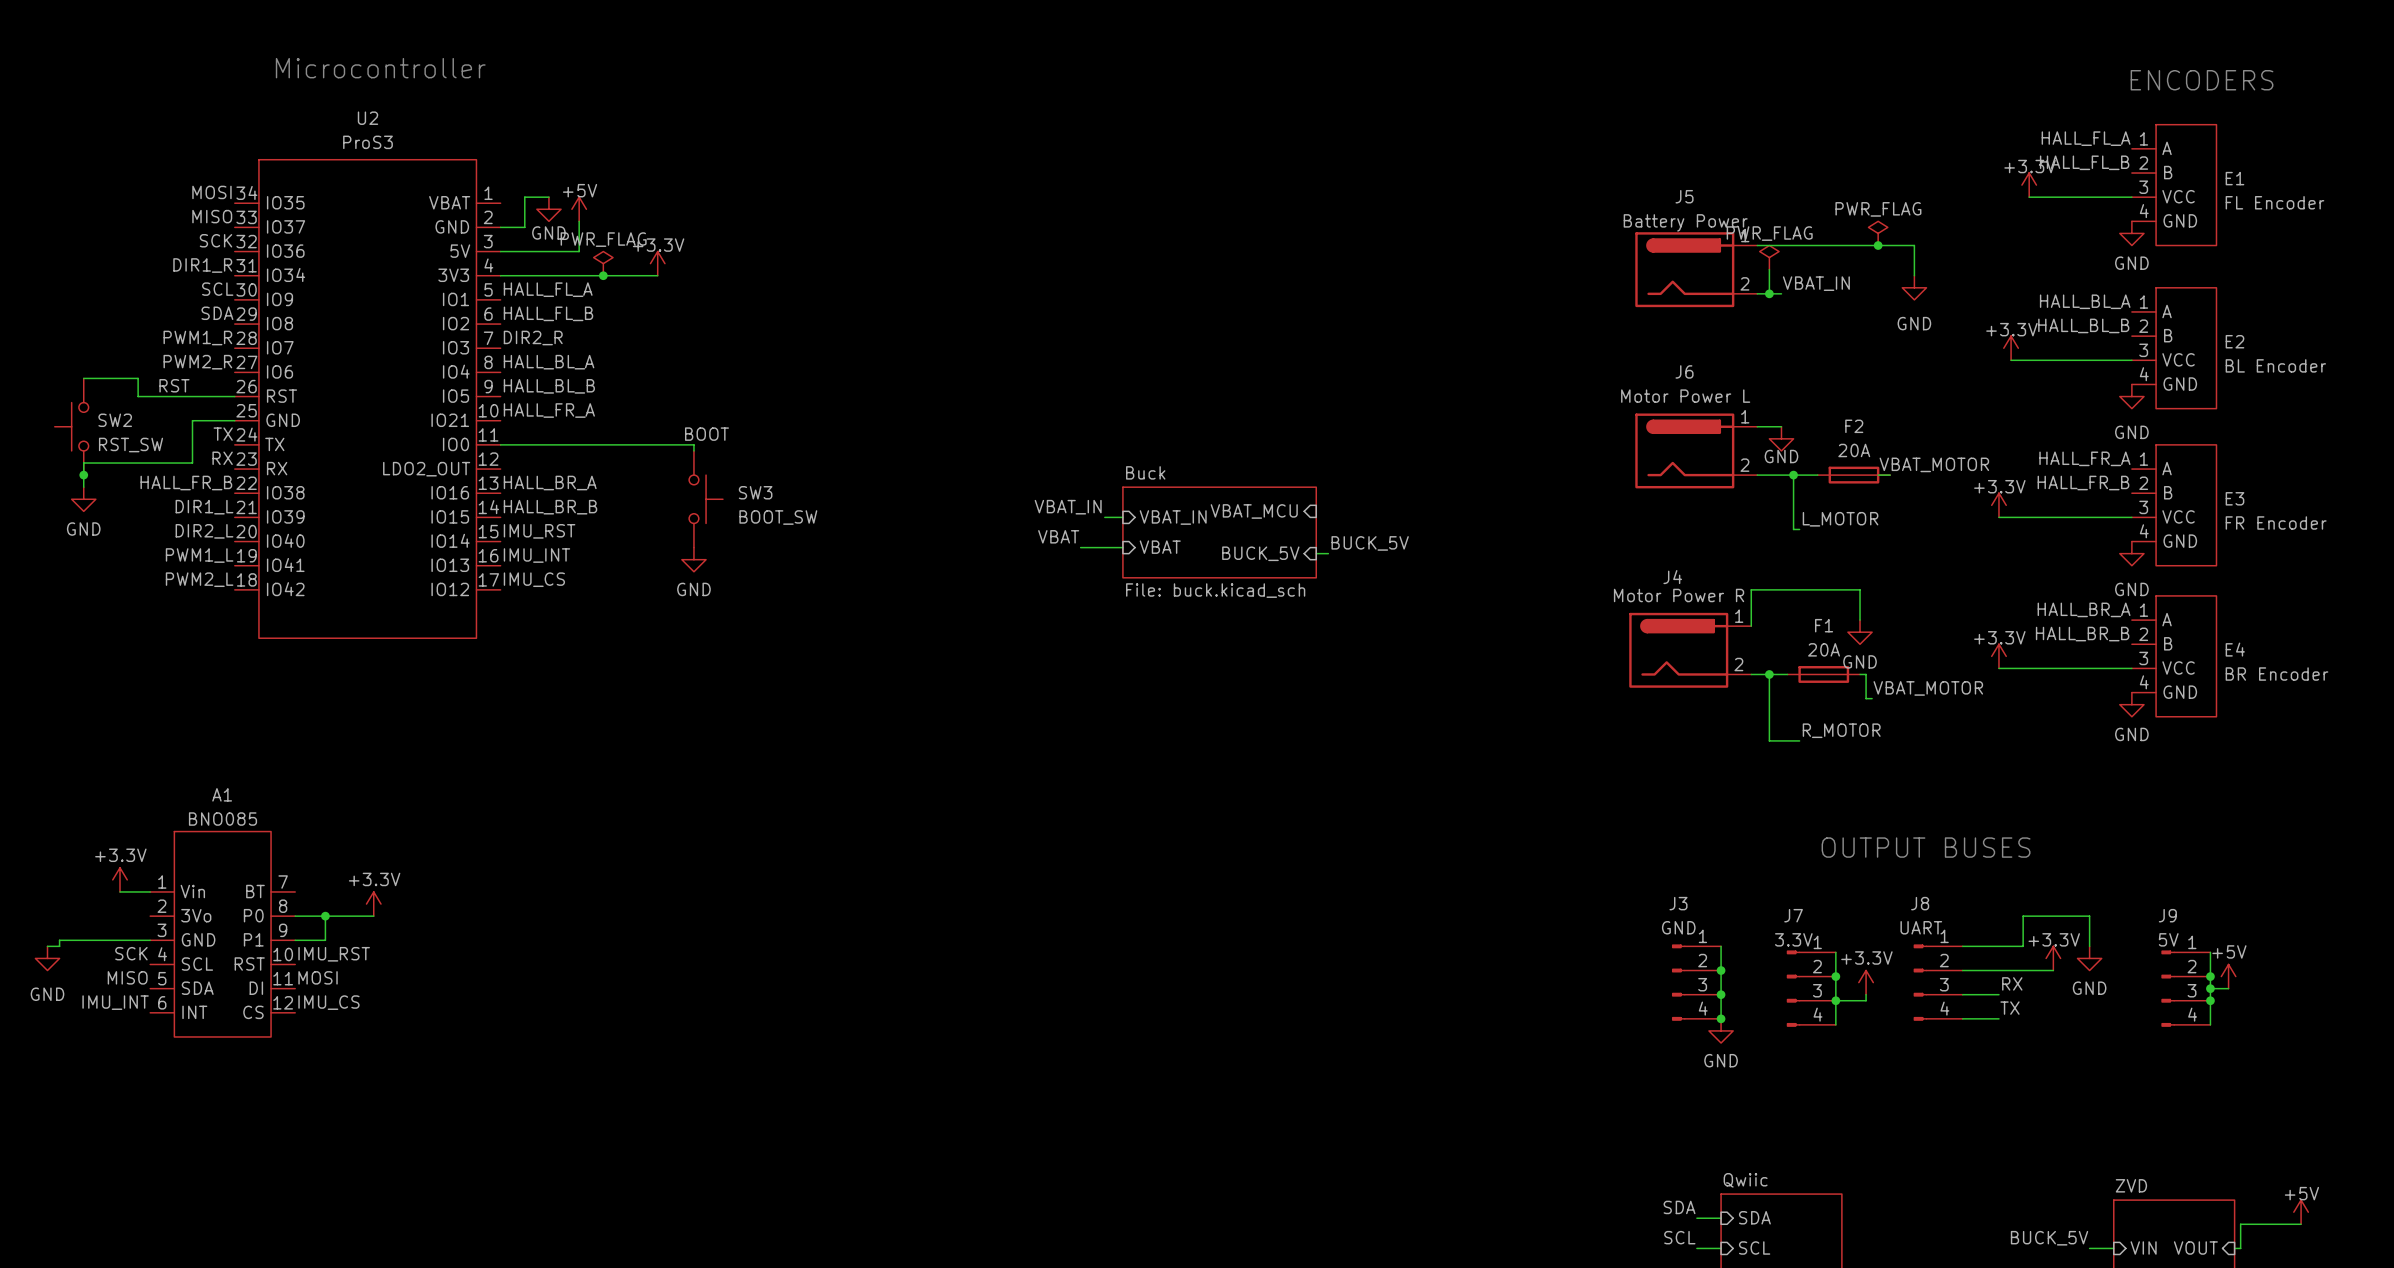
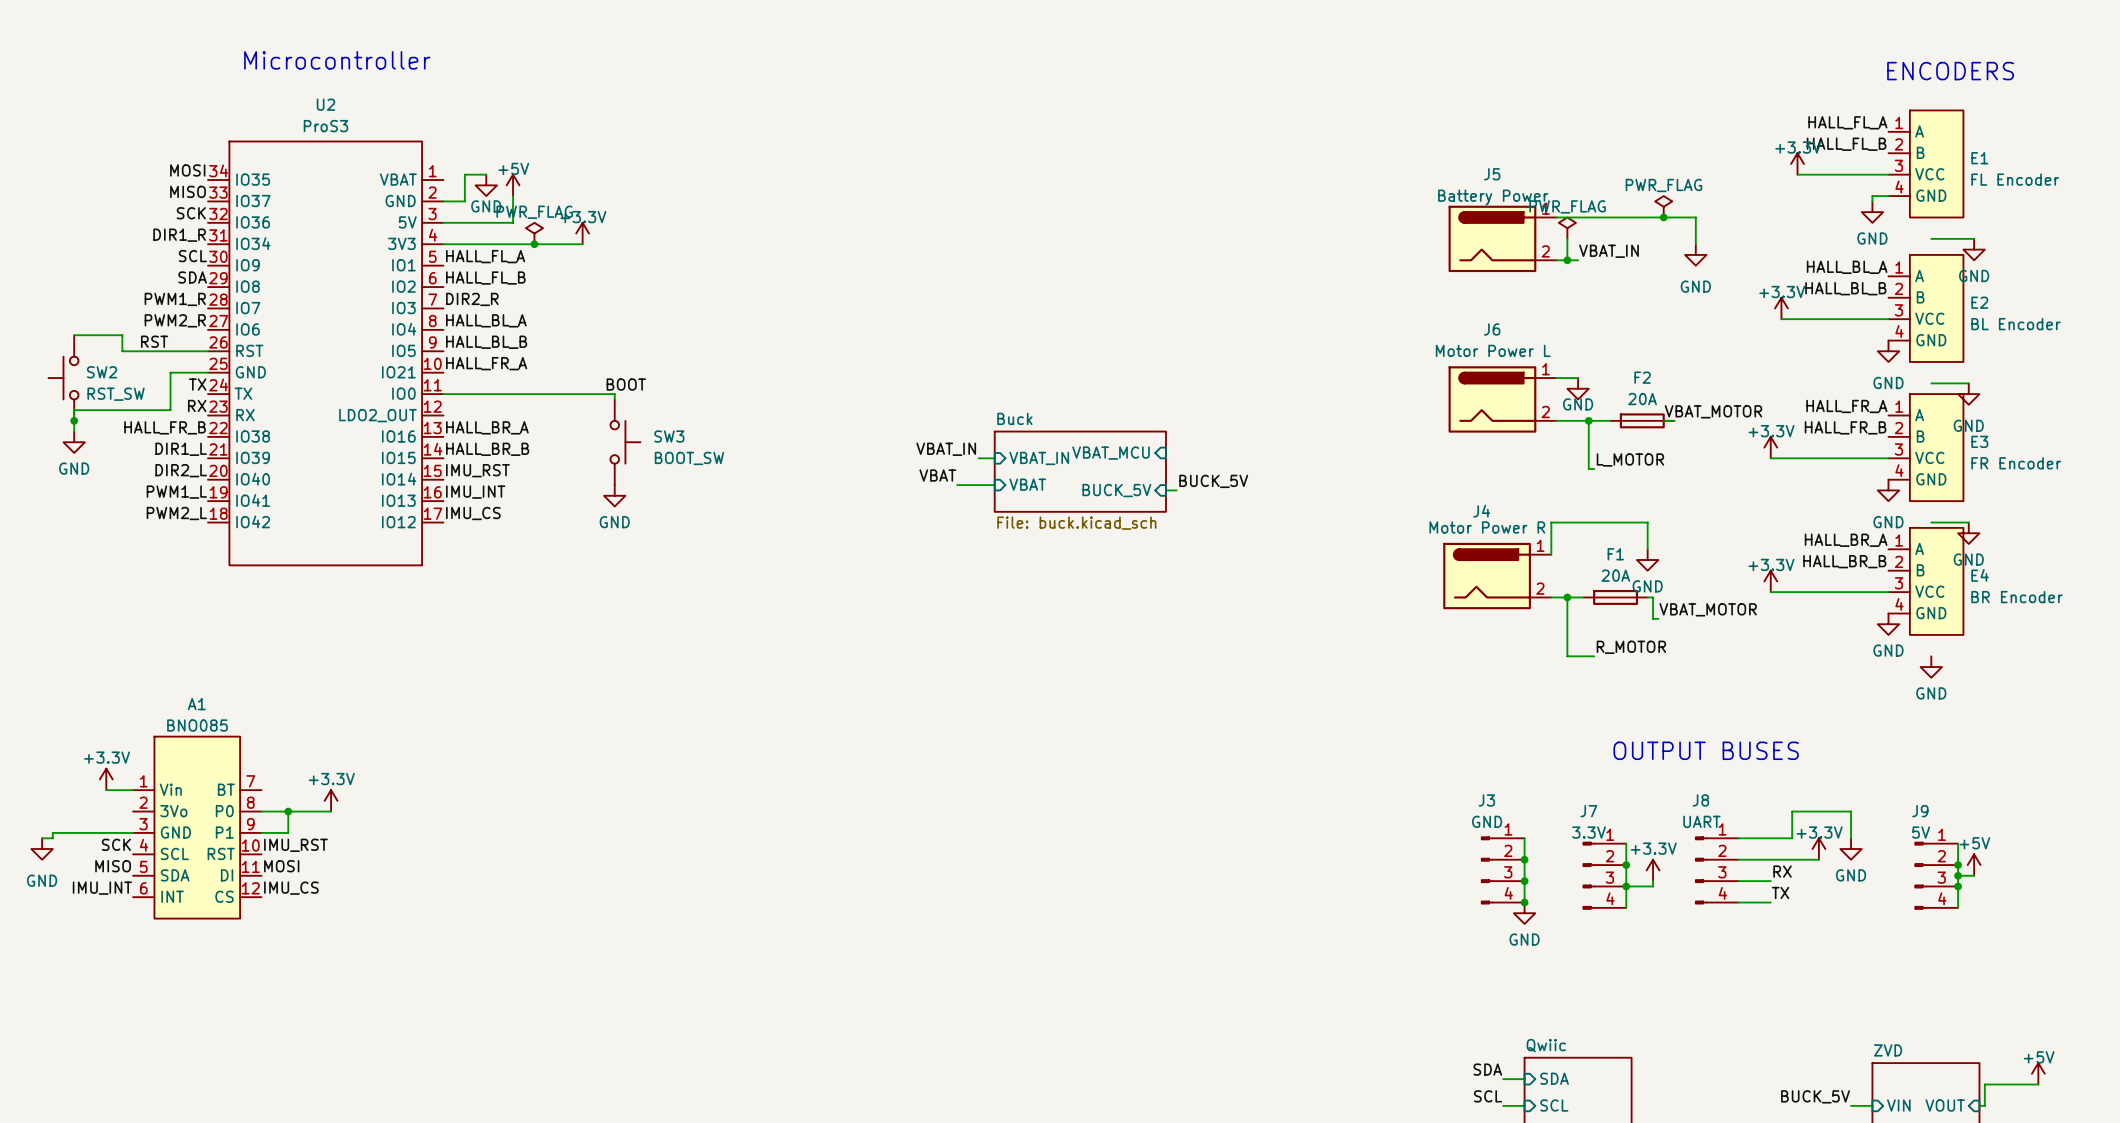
wire: none -> (1888, 196) (1872, 196) (1872, 201)
power symbol position: GND (2131, 233) -> GND (1872, 212)
wire: none -> (1931, 238) (1974, 238)
power symbol: none -> GND (1974, 249)
wire: none -> (1931, 383) (1968, 383)
power symbol: none -> GND (1968, 394)
wire: none -> (1931, 522) (1968, 522)
power symbol: none -> GND (1968, 533)
power symbol: none -> GND (1931, 667)

